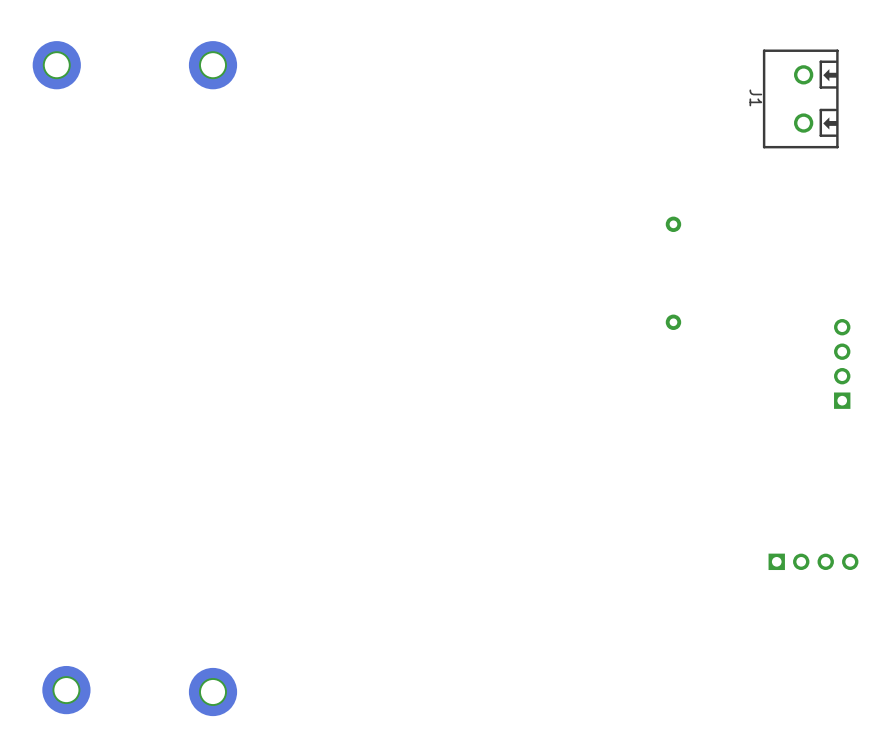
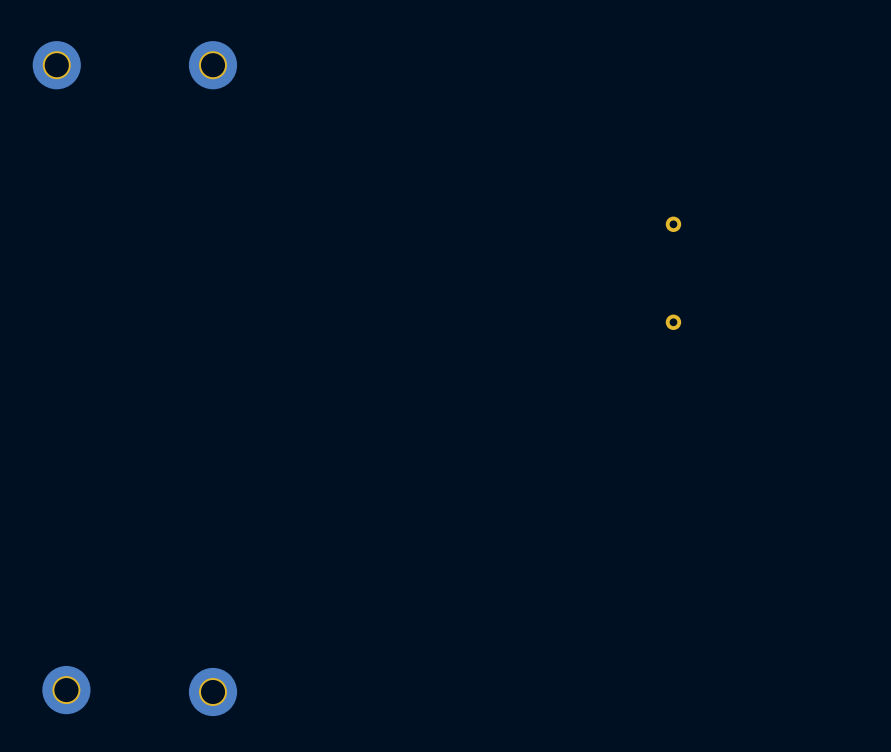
J1: (800, 98) -> none
part: (842, 363) -> none
part: (813, 561) -> none

